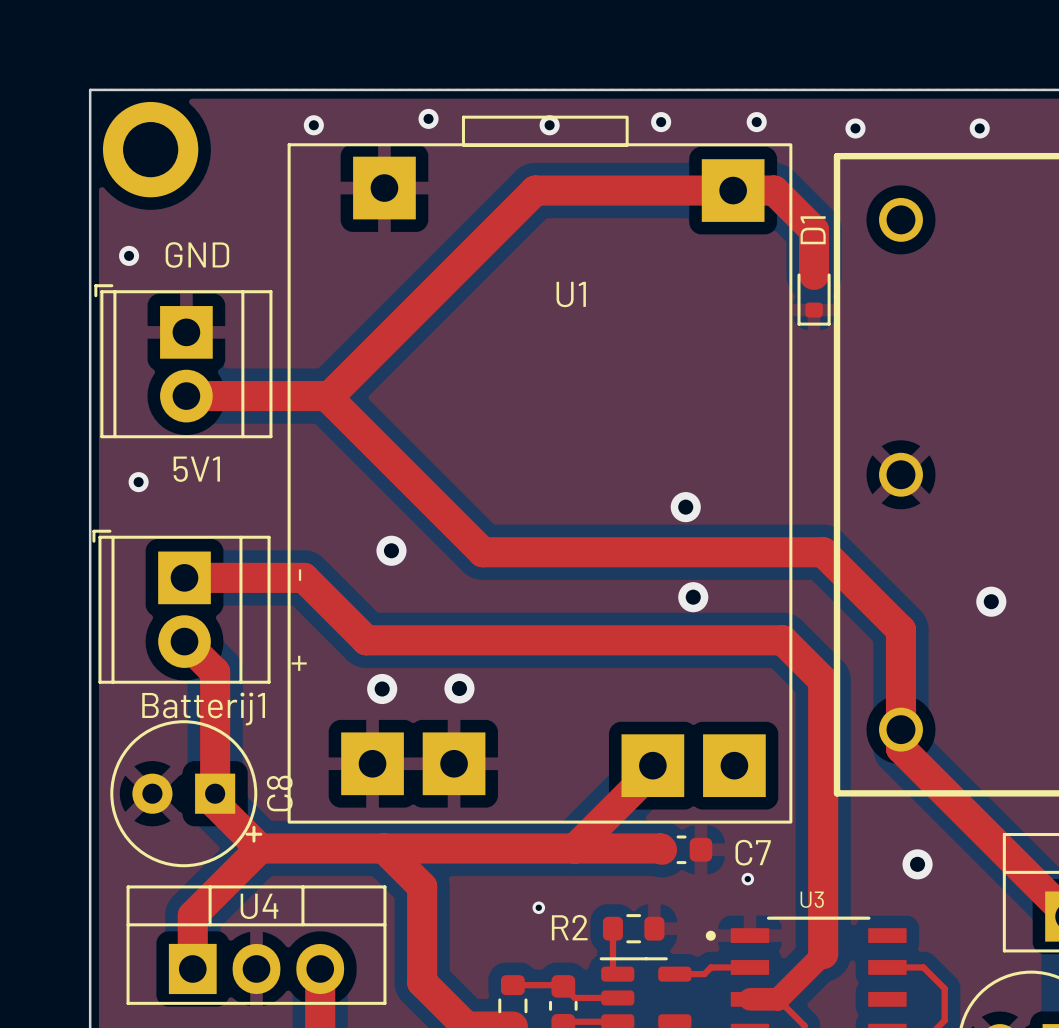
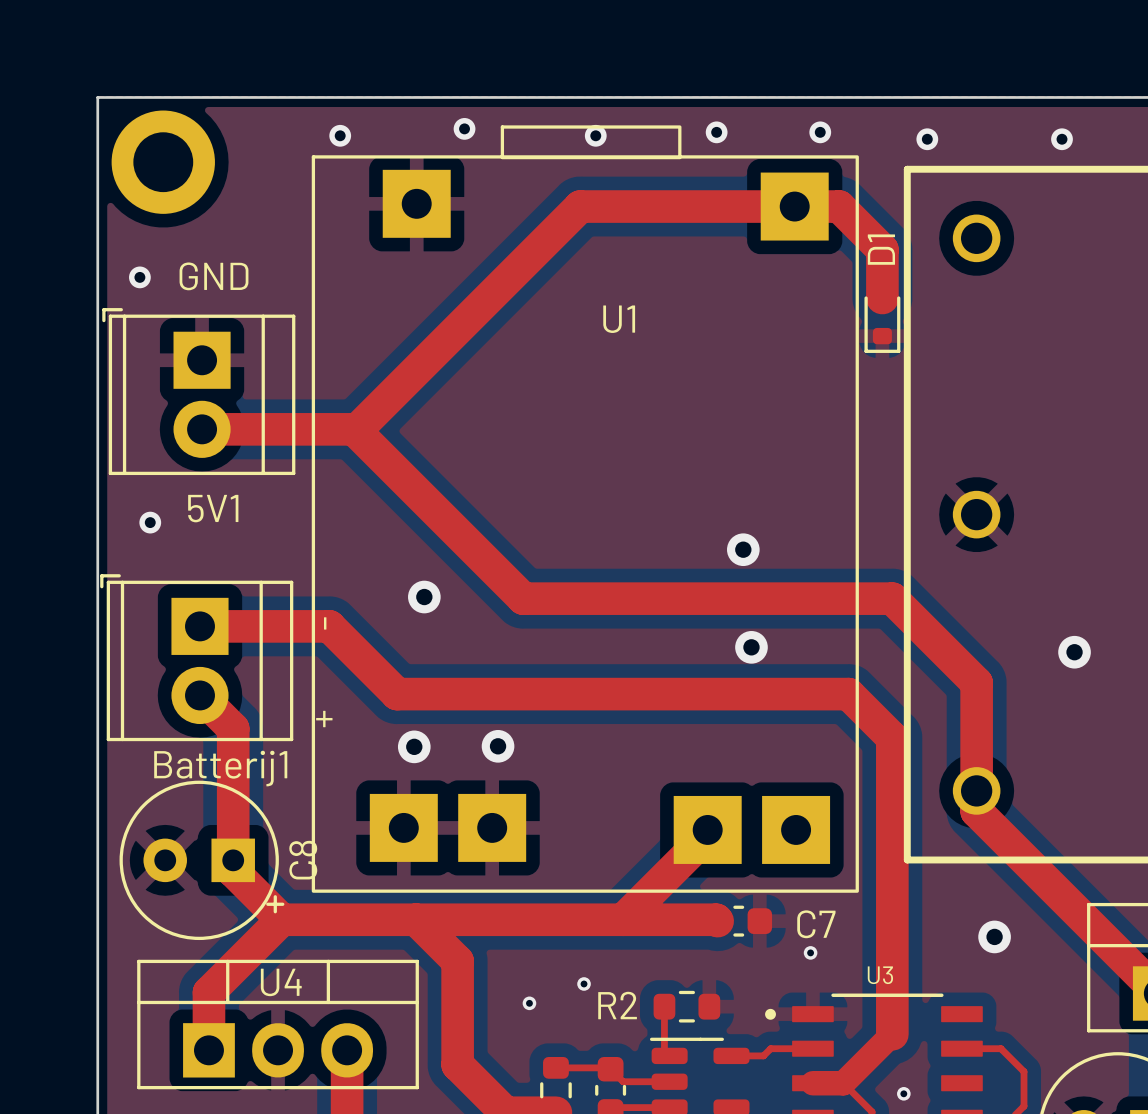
via: none -> (529, 1003)
via: none -> (903, 1093)

